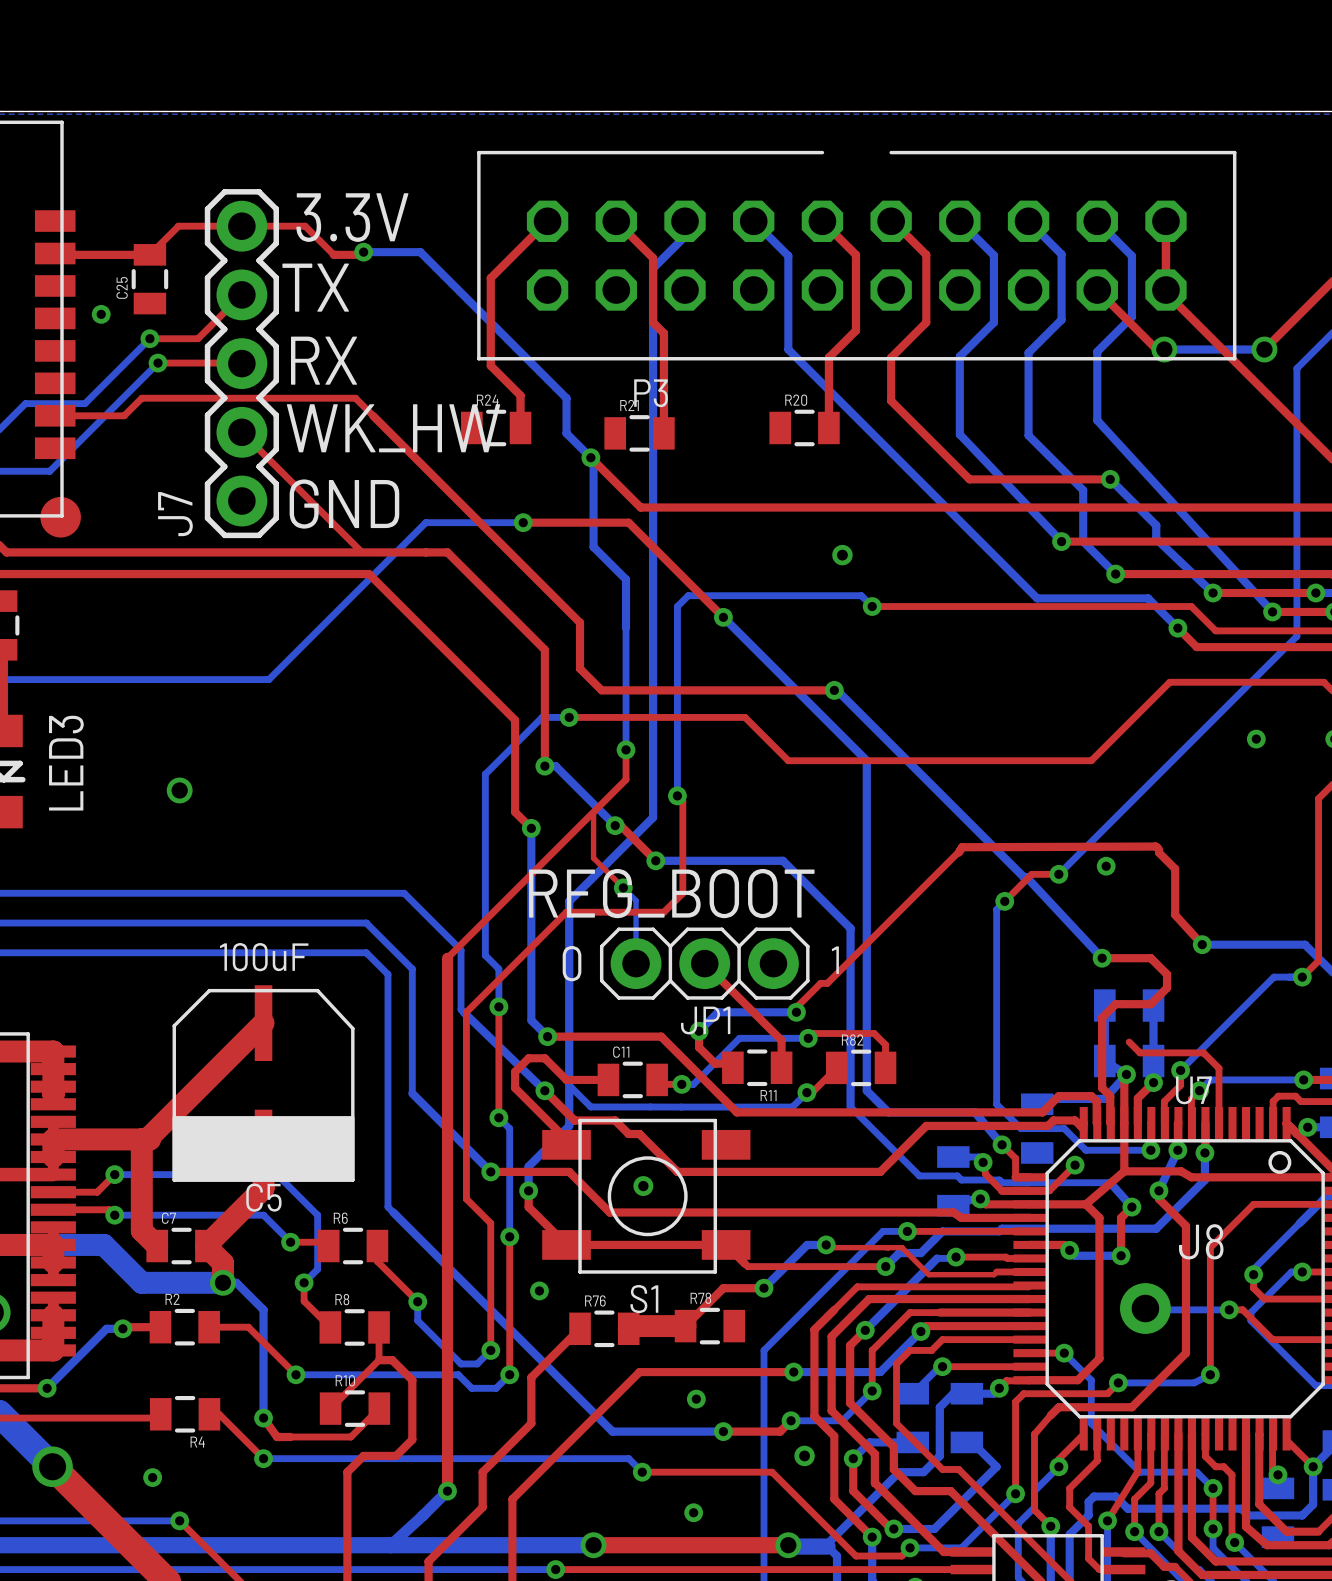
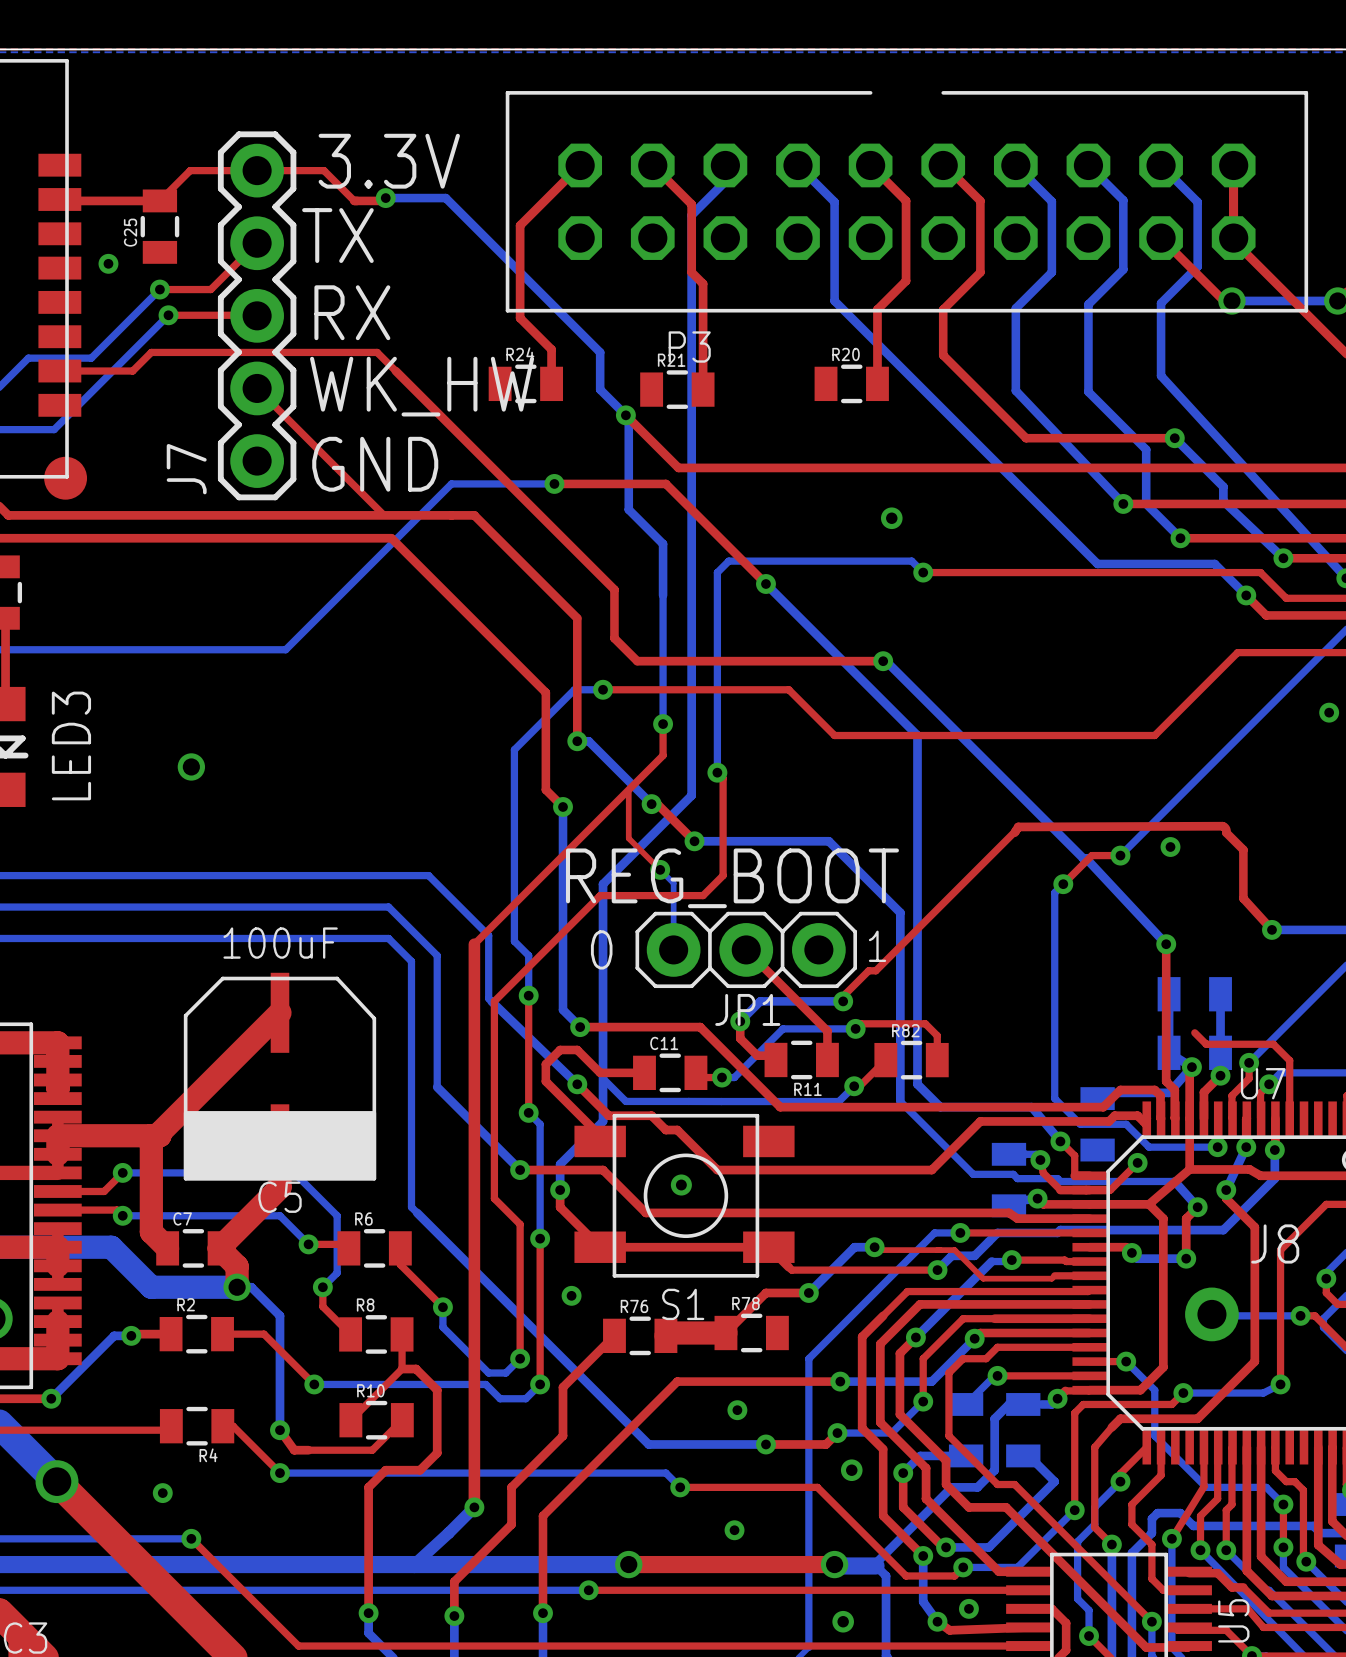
top track: (1102, 958) (1150, 958) (1167, 974) (1167, 987) (1150, 1004) (1115, 1004) (1102, 1017) -> (1166, 944) (1166, 1007)

